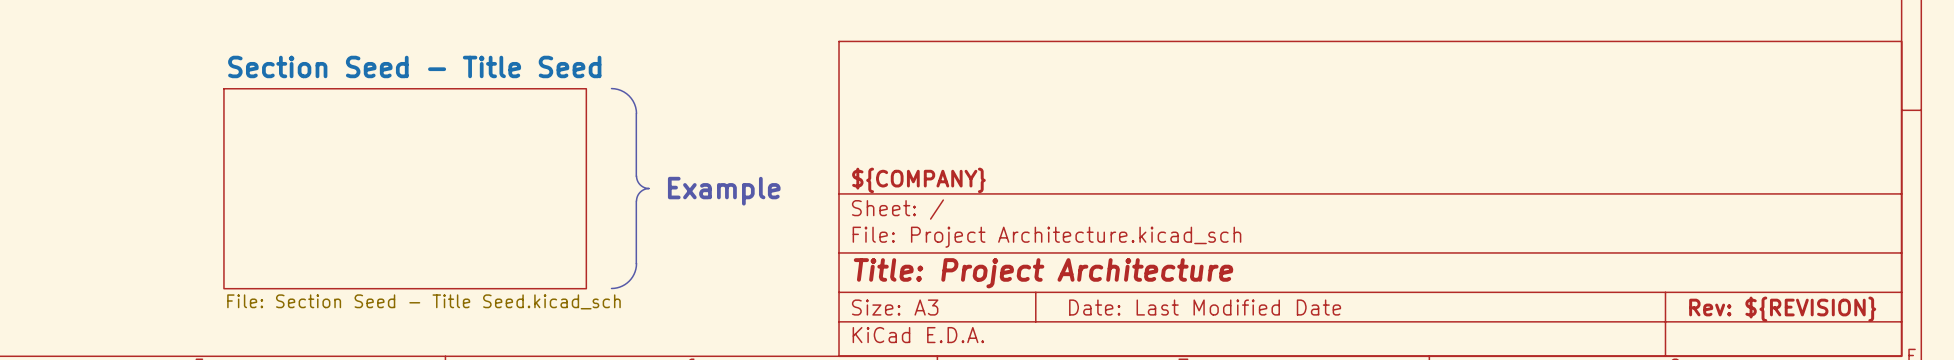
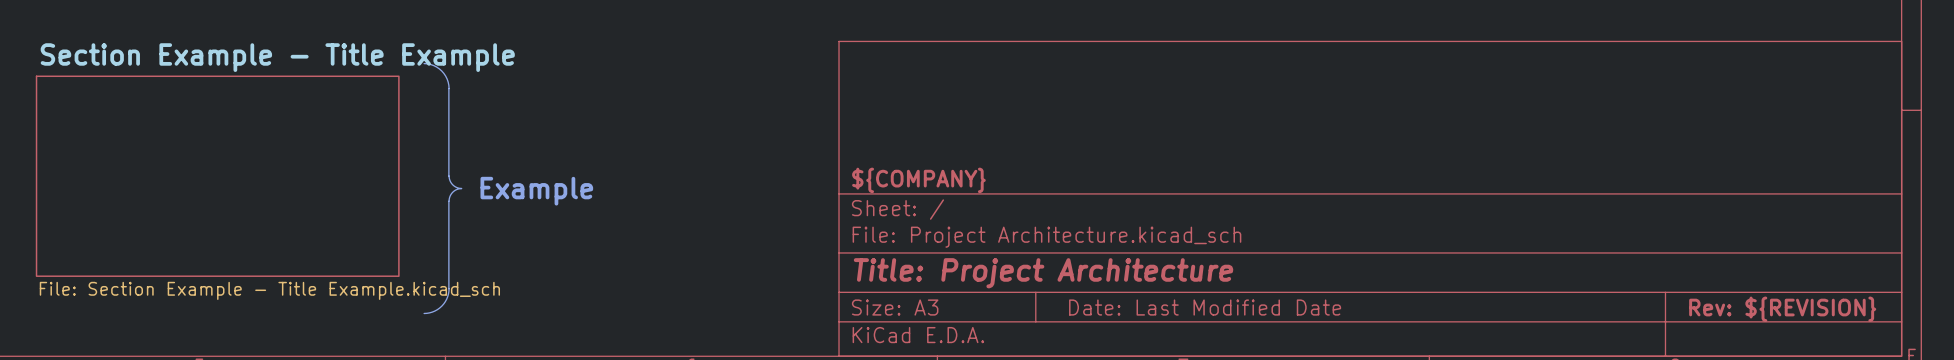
line: none -> (448, 88) (448, 176)
line: (611, 88) (621, 90) (629, 95) (634, 104) (636, 113) -> (424, 63) (433, 65) (441, 70) (447, 79) (449, 88)
line: (636, 113) (636, 176) -> none
sheet Section Example - Title Example: none -> File: Section Example - Title Example.kicad_sch (217, 176)
line: (636, 176) (640, 184) (649, 188) (640, 192) (636, 201) -> (449, 176) (452, 184) (461, 188) (452, 192) (449, 201)
sheet Section Seed - Title Seed: File: Section Seed - Title Seed.kicad_sch (405, 188) -> none
text position: Example (724, 191) -> Example (536, 191)
line: none -> (448, 201) (448, 288)
line: (636, 201) (636, 263) -> none
line: (636, 263) (635, 271) (629, 281) (619, 287) (611, 288) -> (449, 288) (447, 296) (441, 306) (432, 312) (424, 313)

